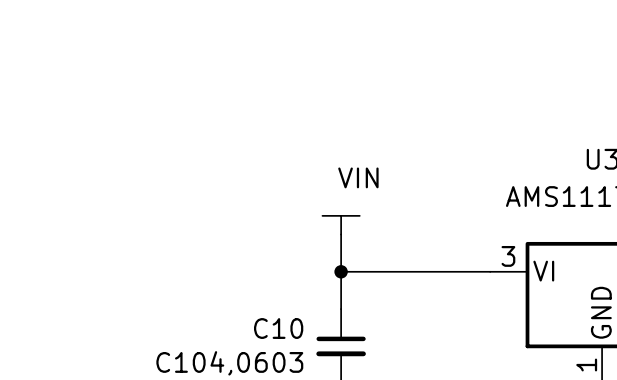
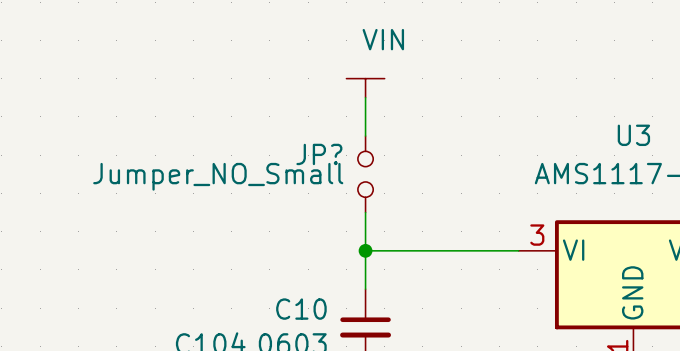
wire: none -> (365, 97) (365, 136)
JP?: none -> Jumper_NO_Small (365, 174)
power symbol position: VIN (341, 225) -> VIN (365, 88)

